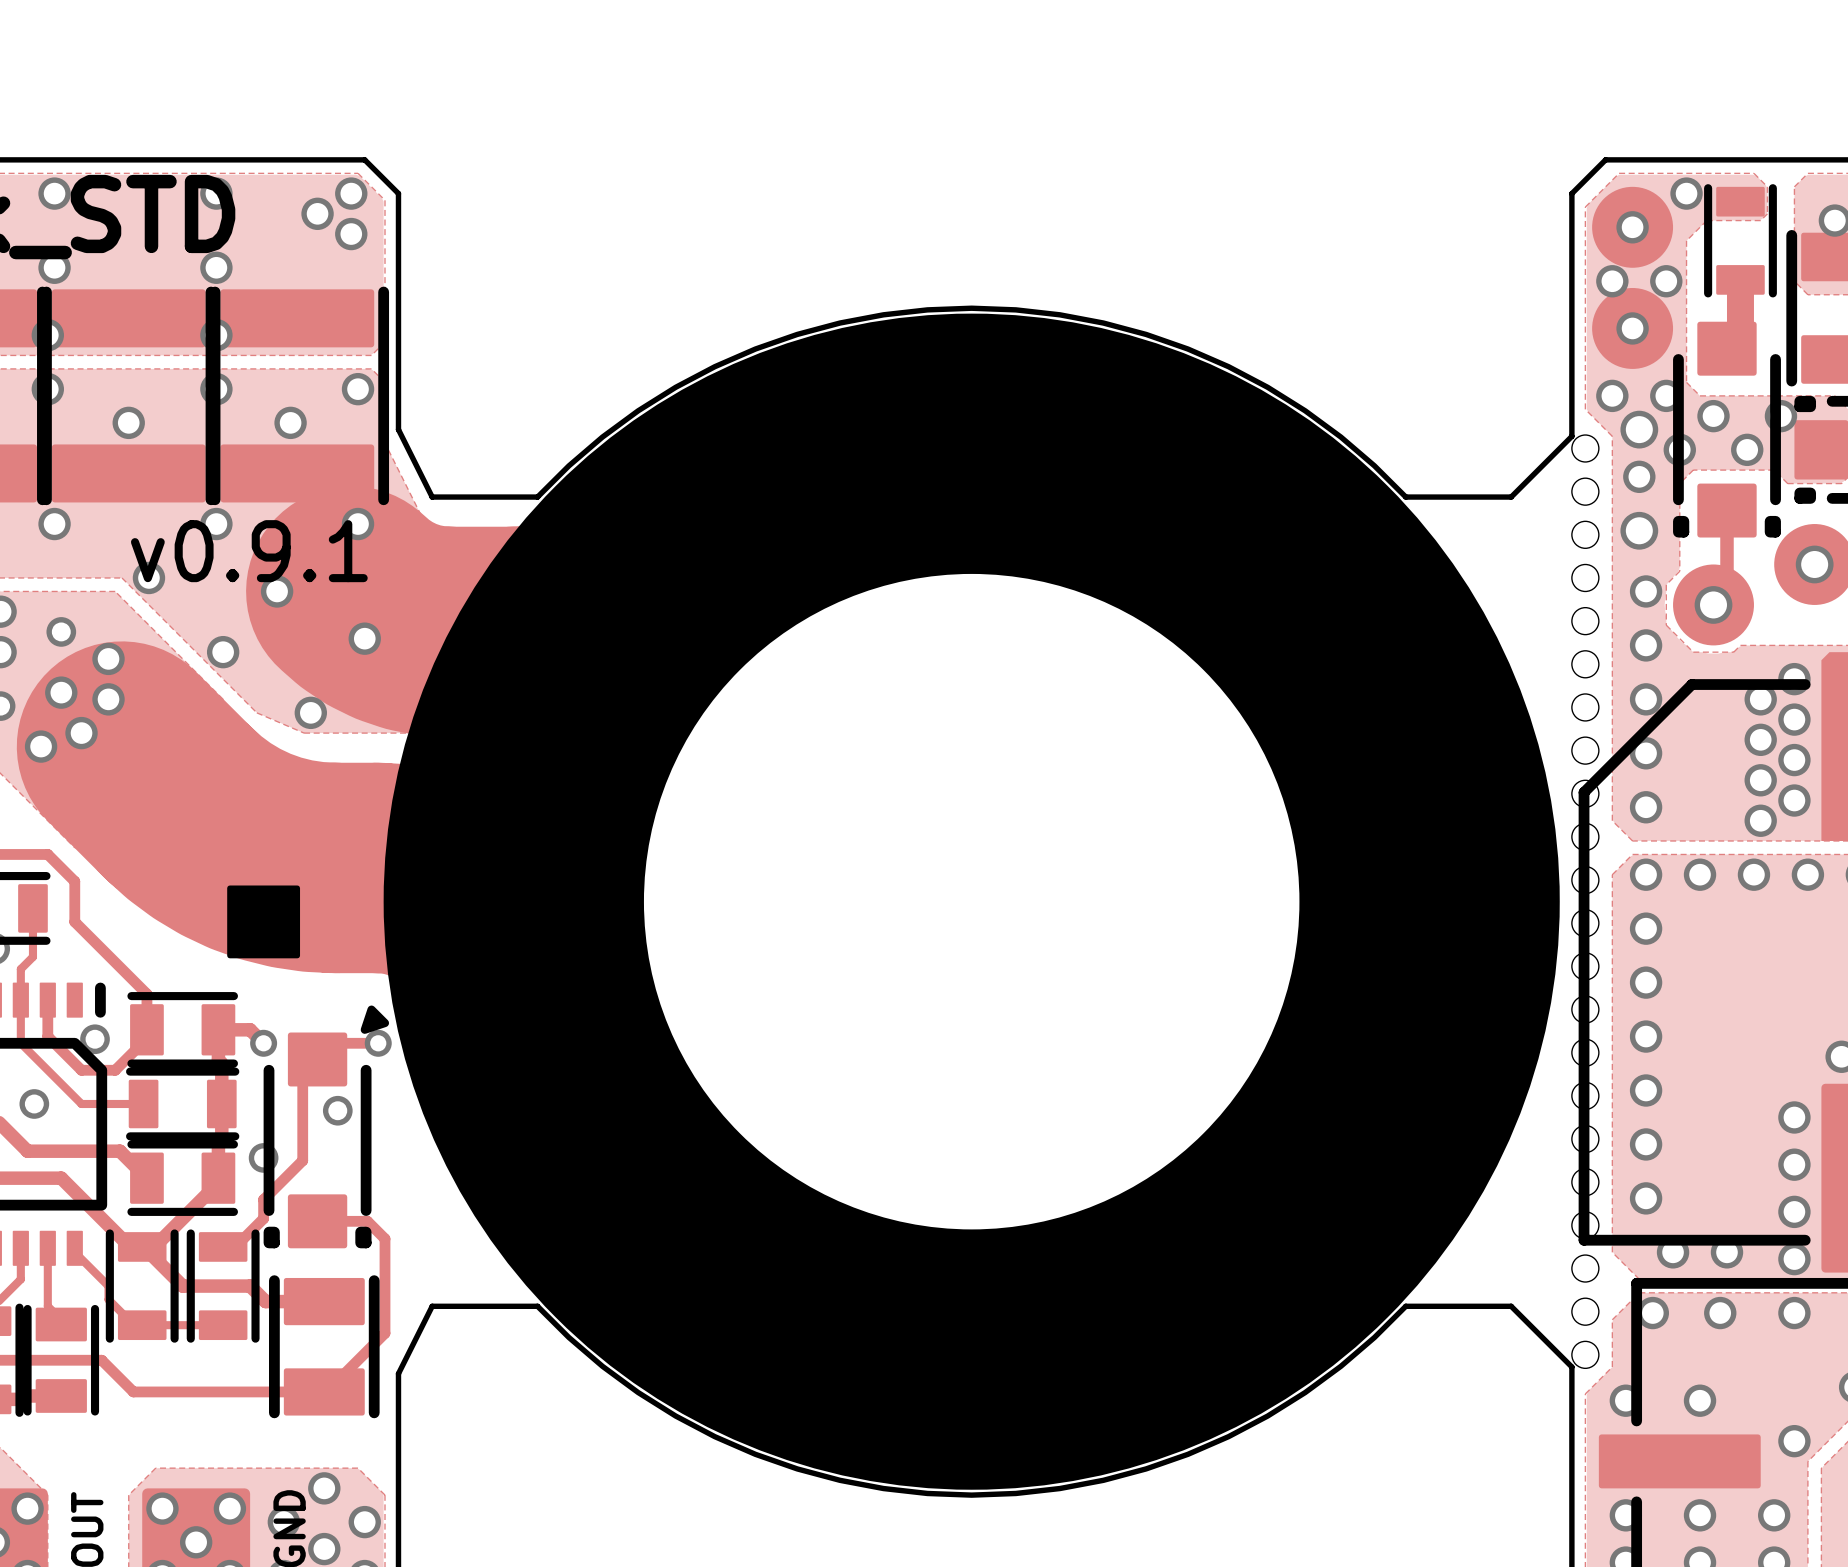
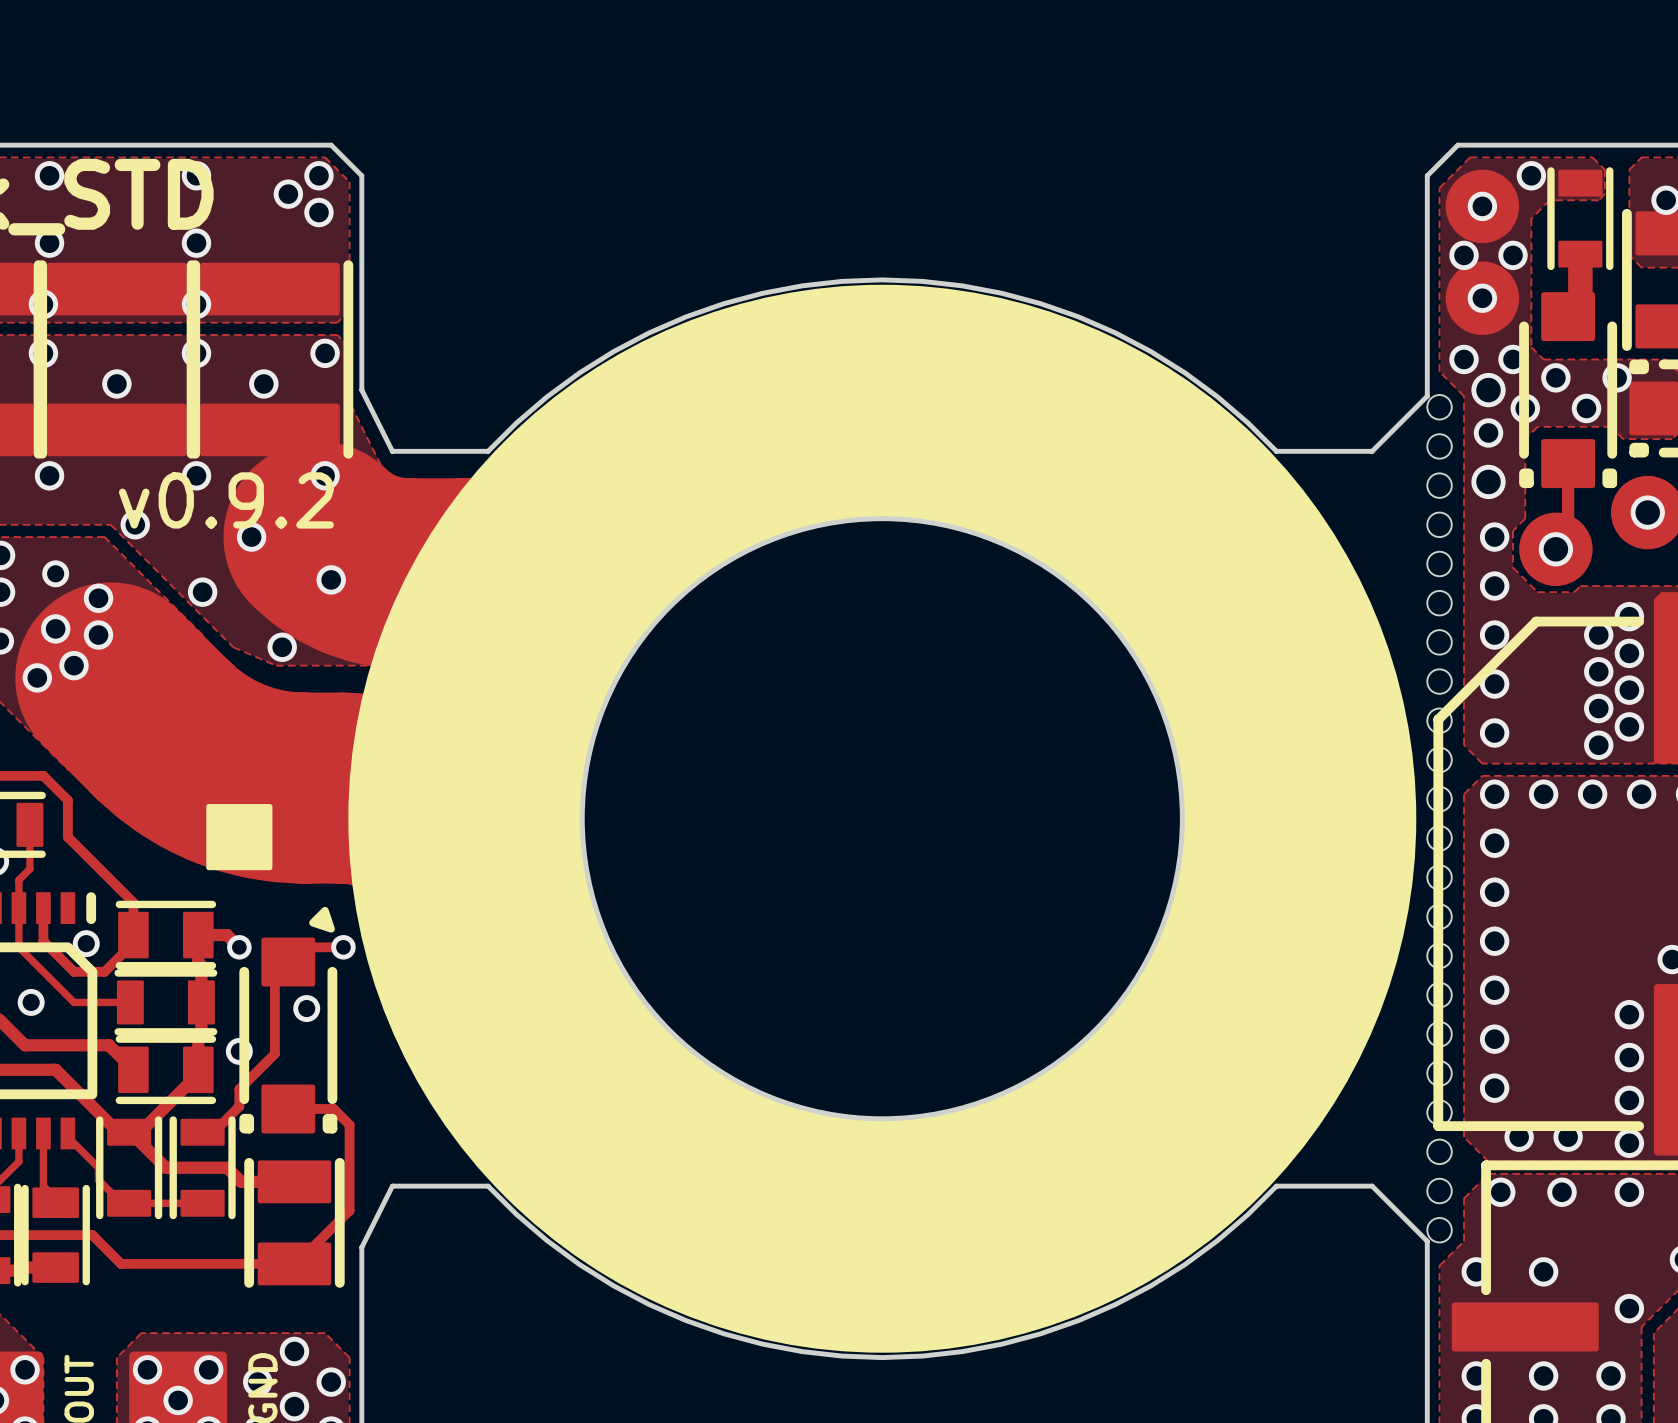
text: v0.9.1 (249, 551) -> v0.9.2 (226, 500)
drawing shape: [360, 1005, 390, 1034] -> [309, 906, 335, 933]

